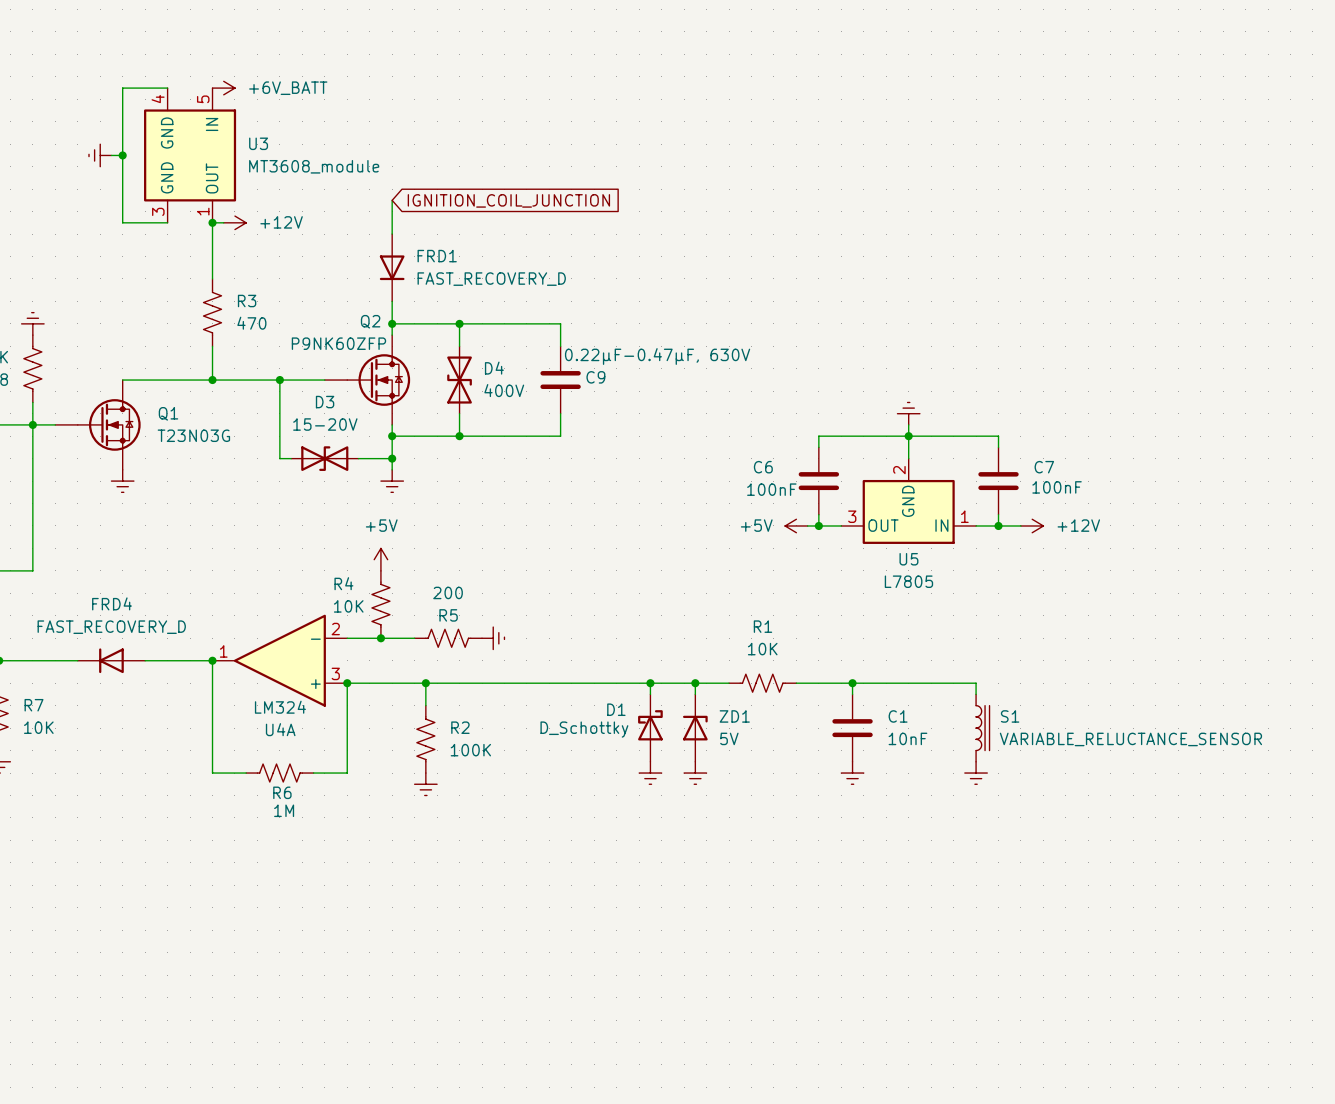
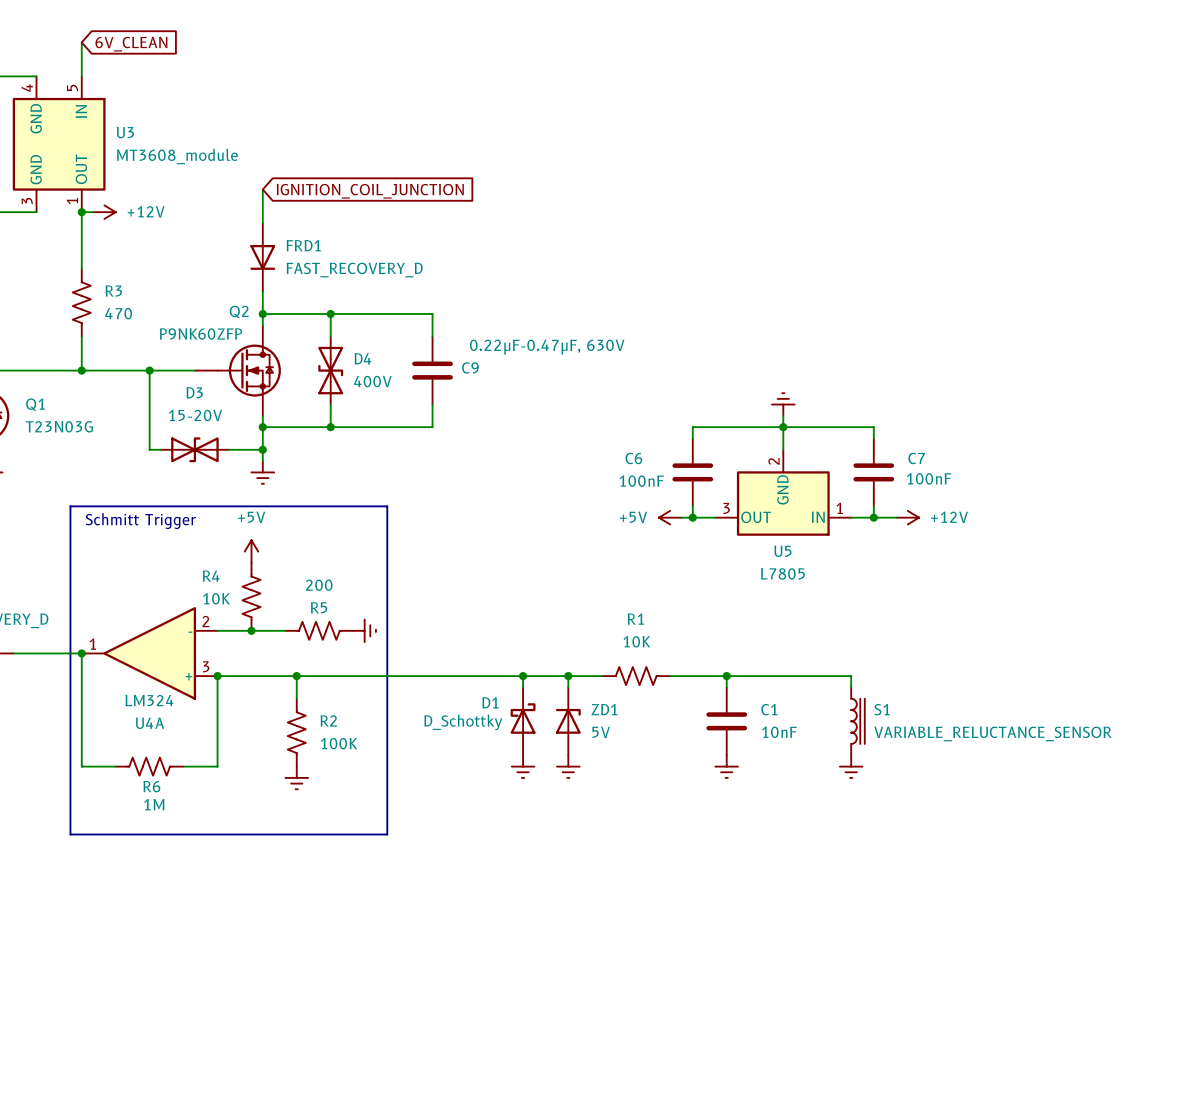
wire: none -> (81, 42) (81, 76)
global label: none -> 6V_CLEAN (131, 44)
power symbol: +6V_BATT (223, 88) -> none
line: none -> (70, 506) (387, 506) (387, 834) (70, 834) (70, 506)
text: none -> Schmitt Trigger (140, 521)

